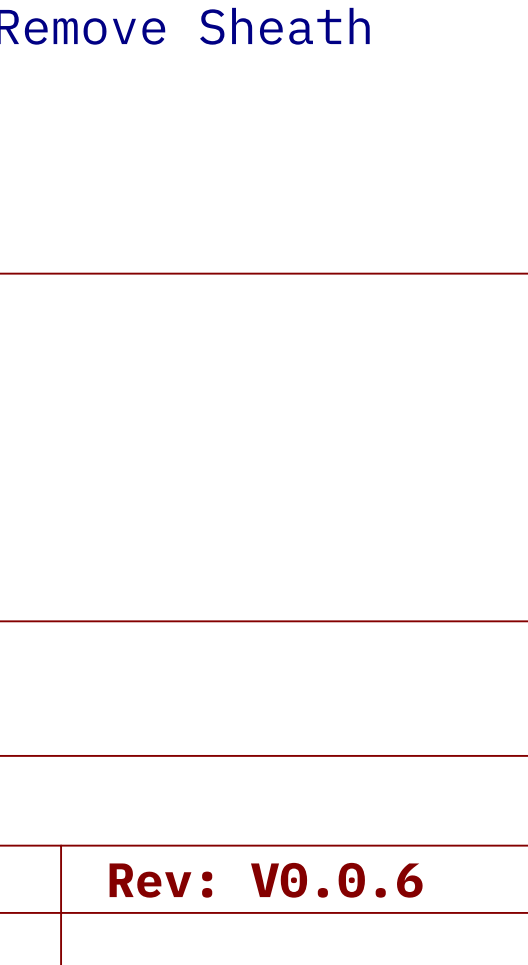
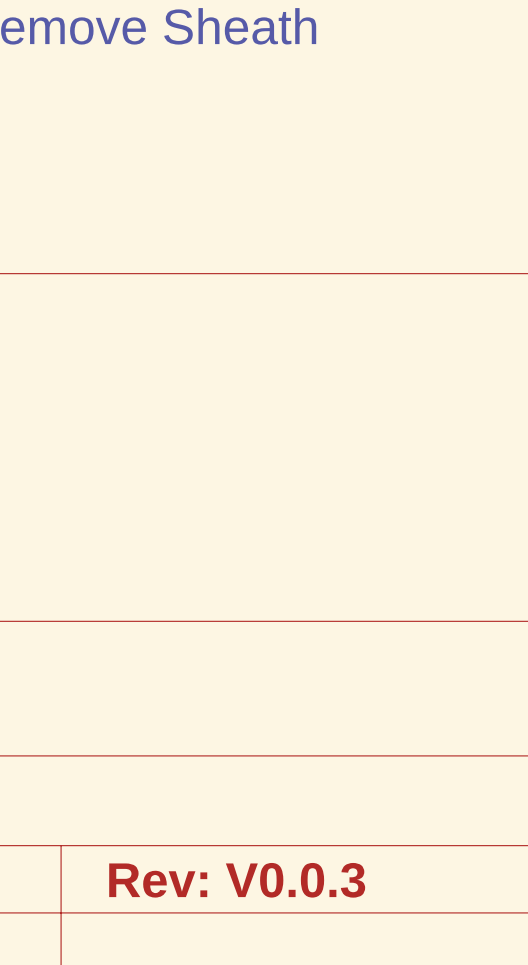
title block: Rev: V0.0.6 (266, 880) -> Rev: V0.0.3 (237, 880)

